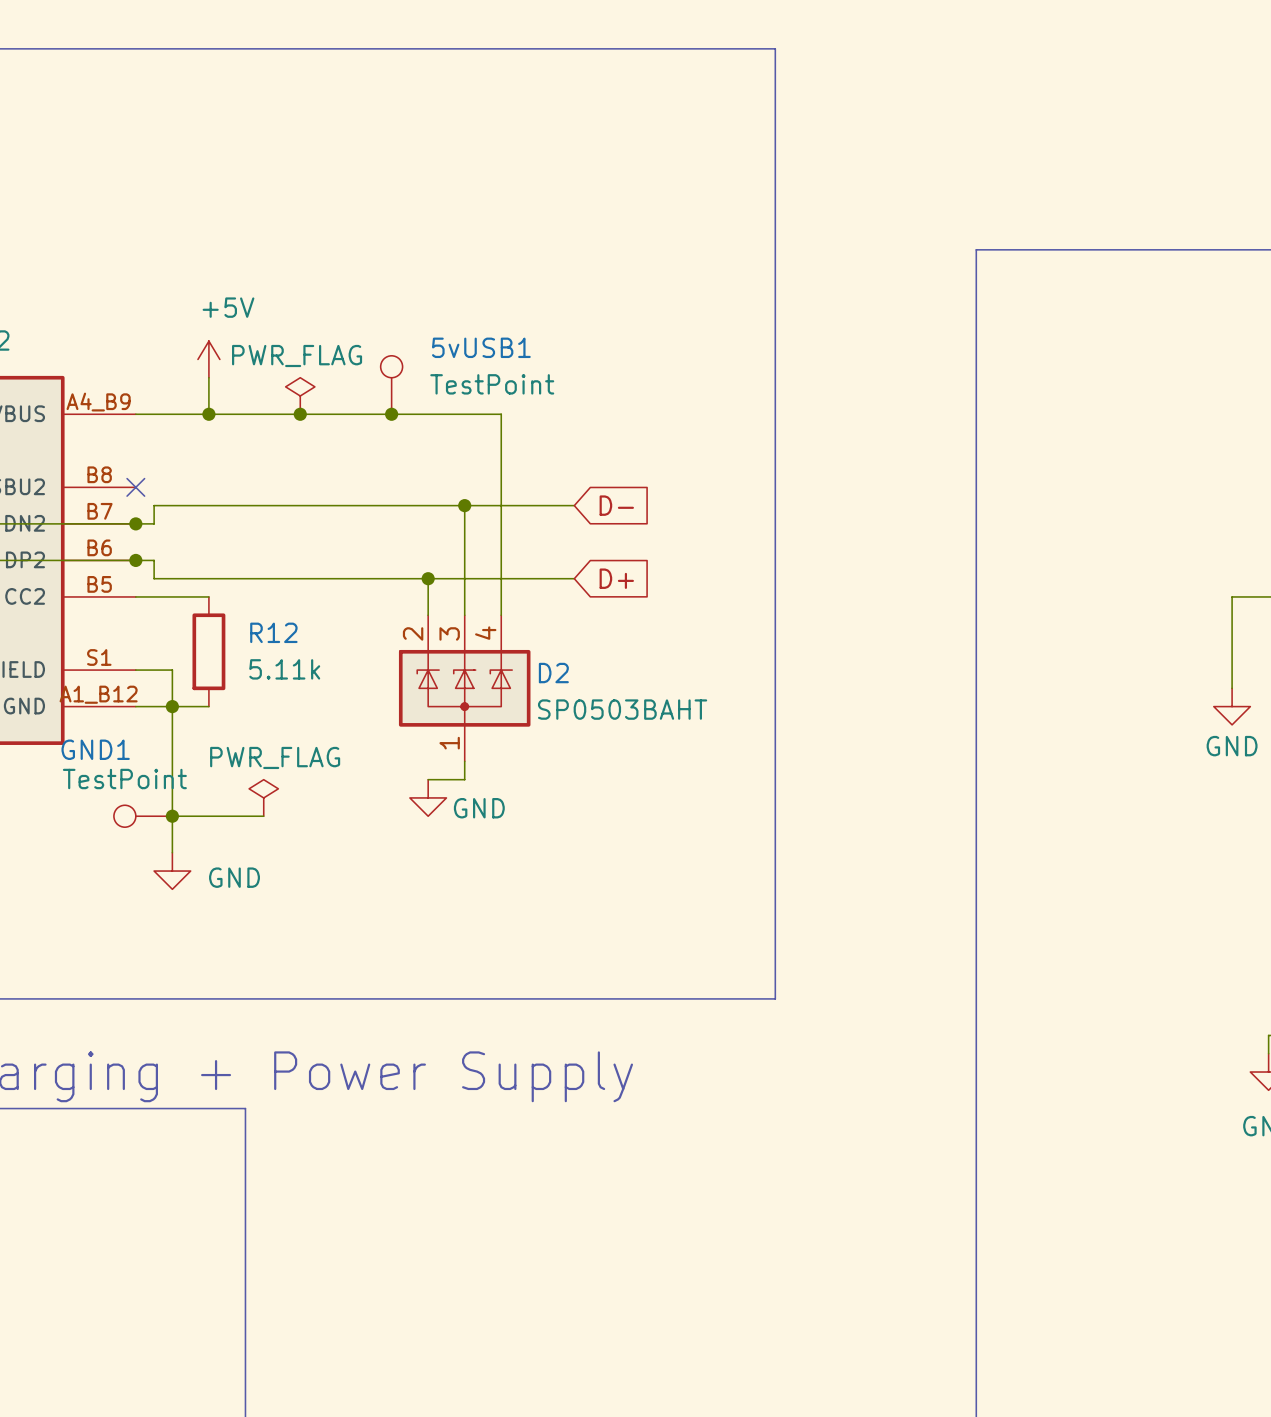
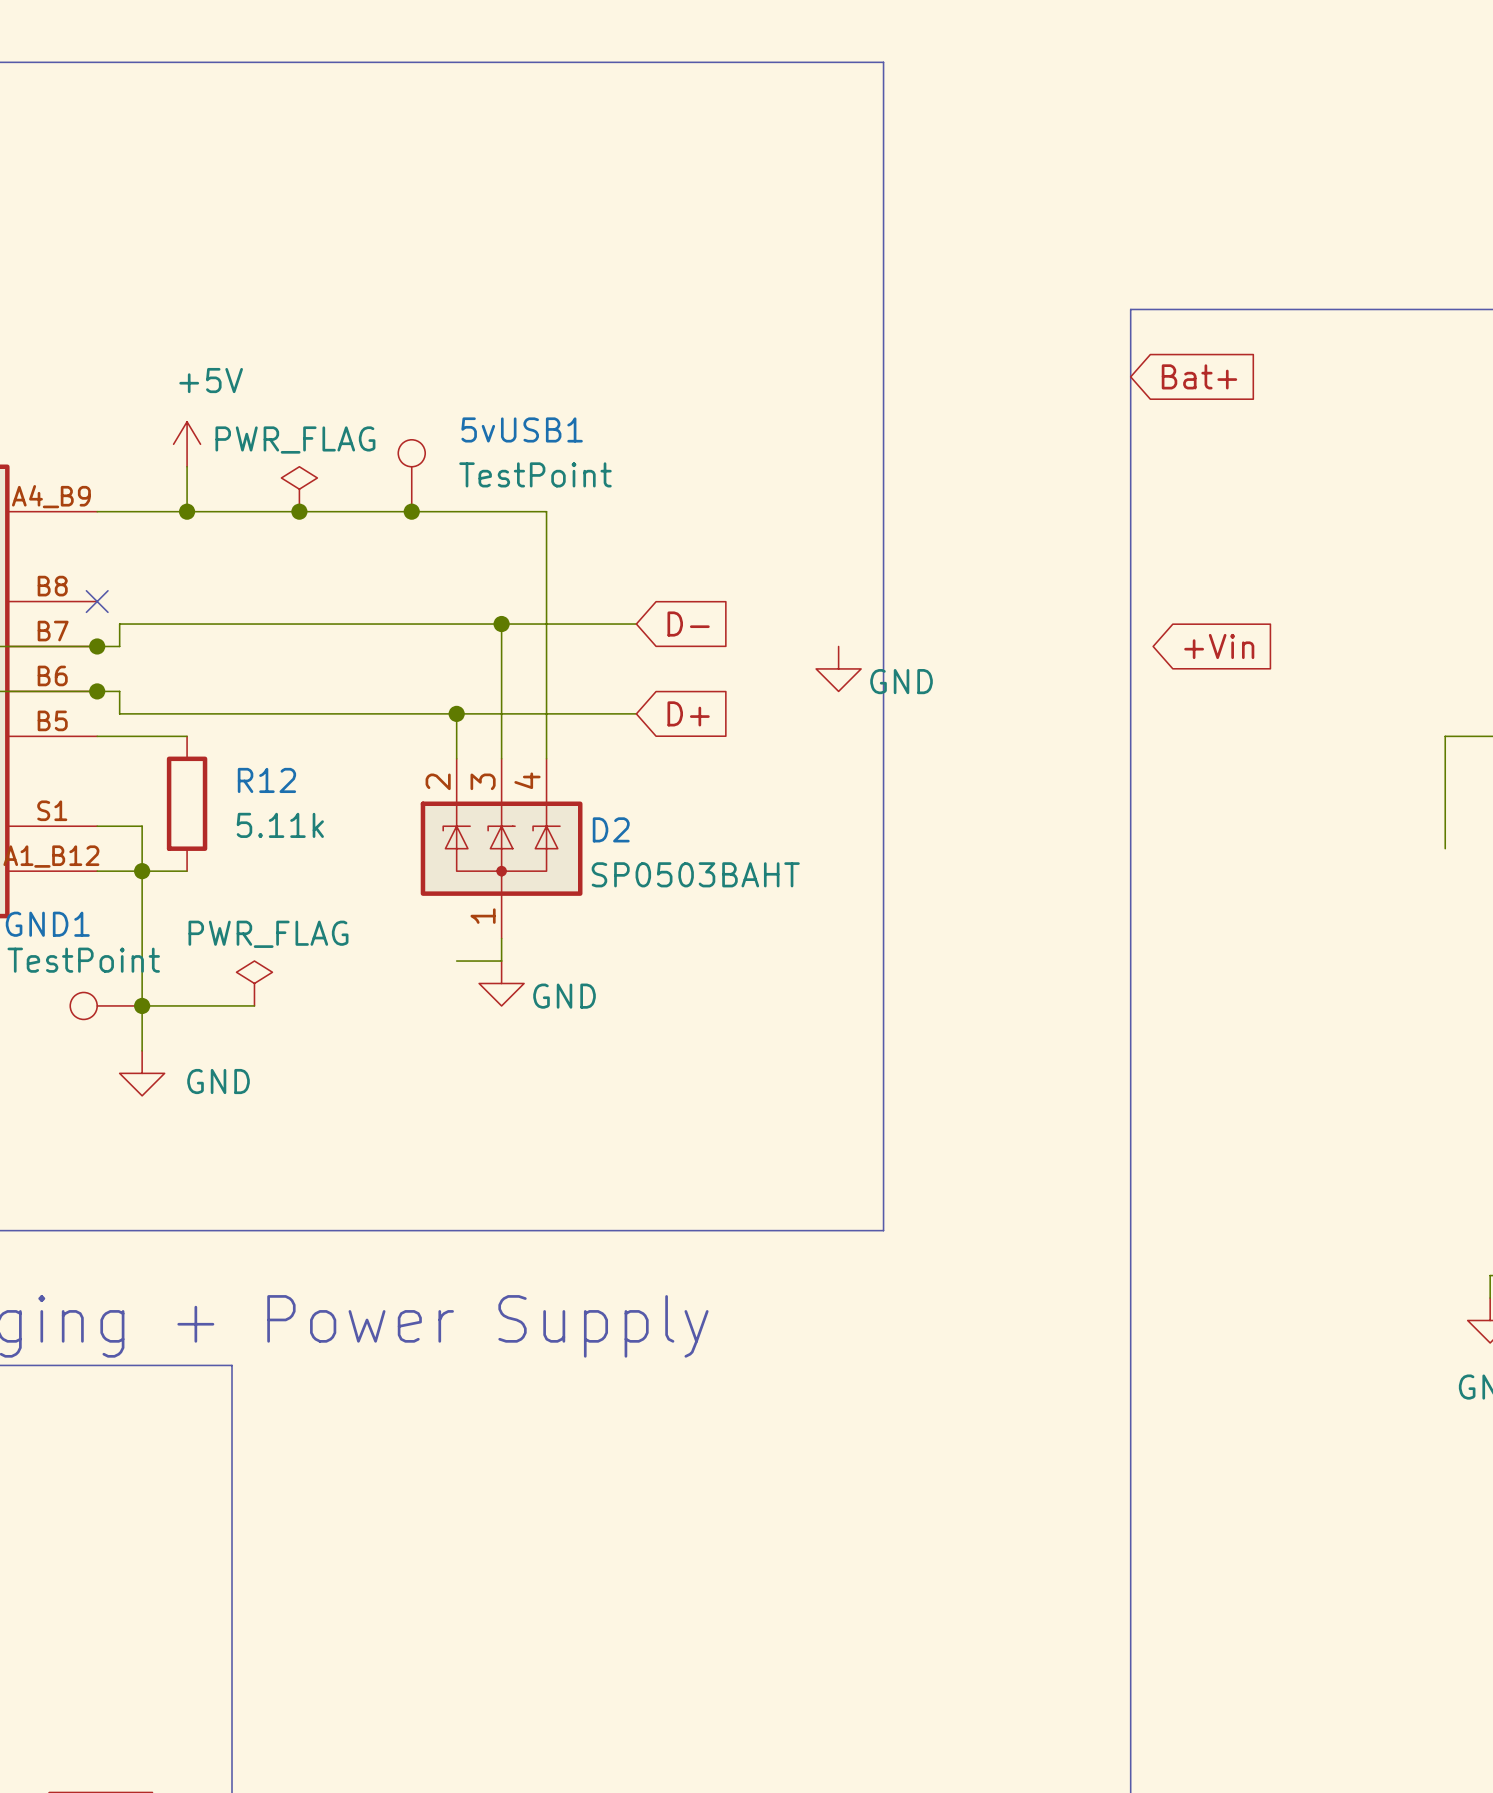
global label: none -> Bat+ (1199, 376)
global label: none -> +Vin (1219, 646)
power symbol: none -> GND (838, 668)
power symbol: GND (1232, 706) -> none
power symbol position: GND (428, 797) -> GND (501, 983)

